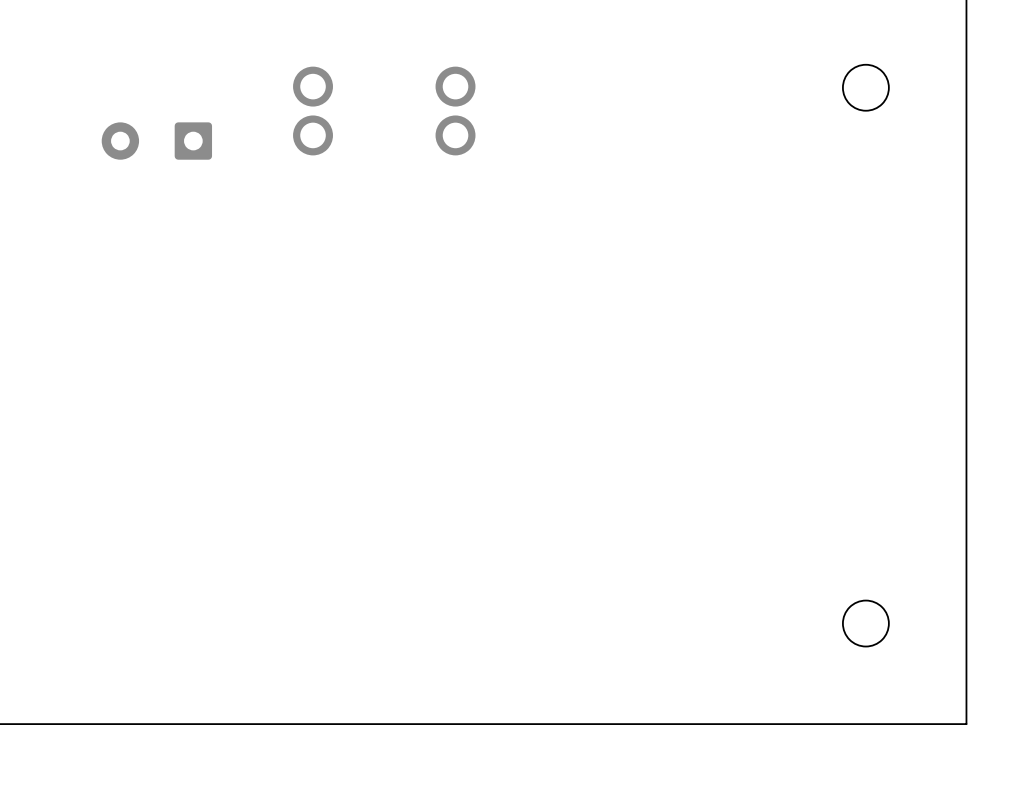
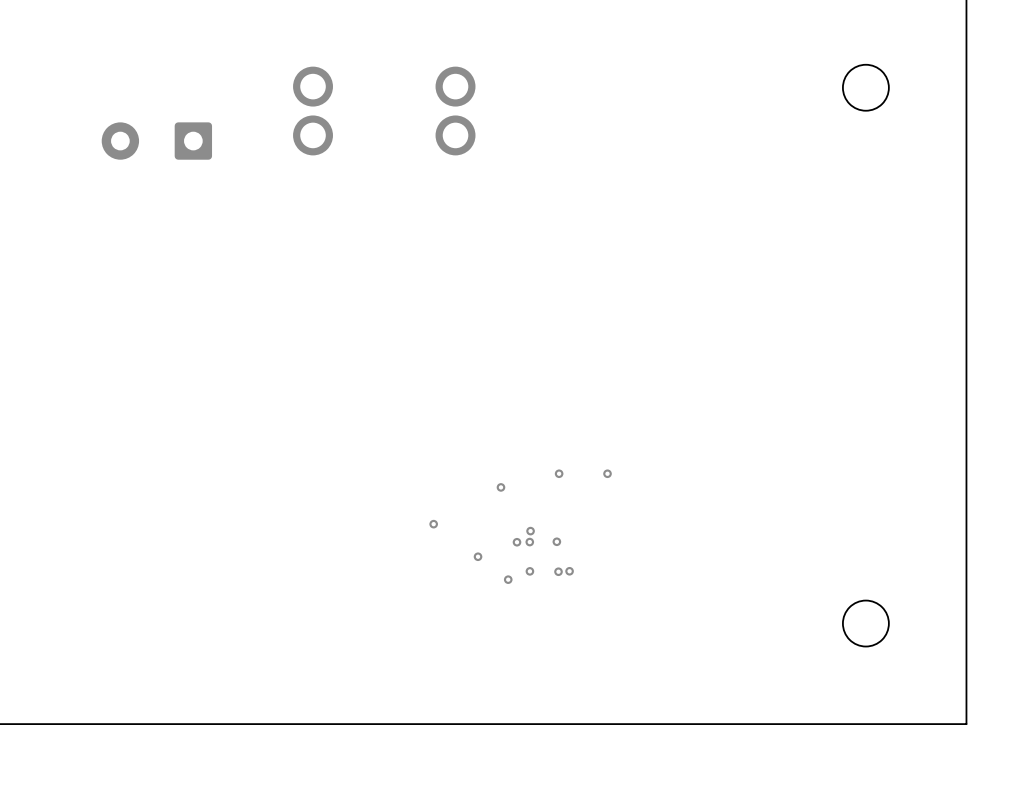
via: none -> (559, 473)
via: none -> (607, 473)
via: none -> (500, 487)
via: none -> (433, 524)
via: none -> (530, 531)
via: none -> (556, 541)
via: none -> (517, 542)
via: none -> (529, 542)
via: none -> (478, 556)
via: none -> (529, 571)
via: none -> (558, 571)
via: none -> (569, 571)
via: none -> (508, 579)

